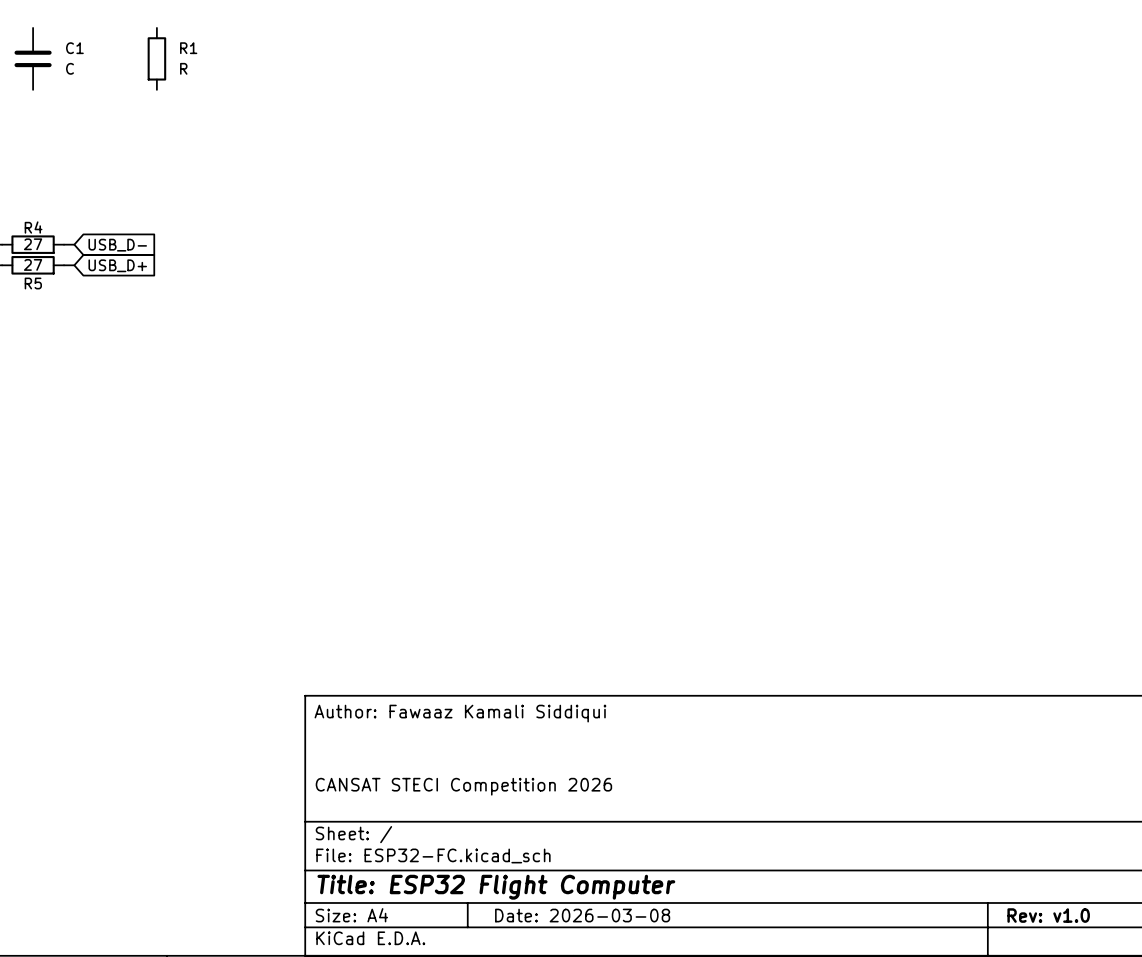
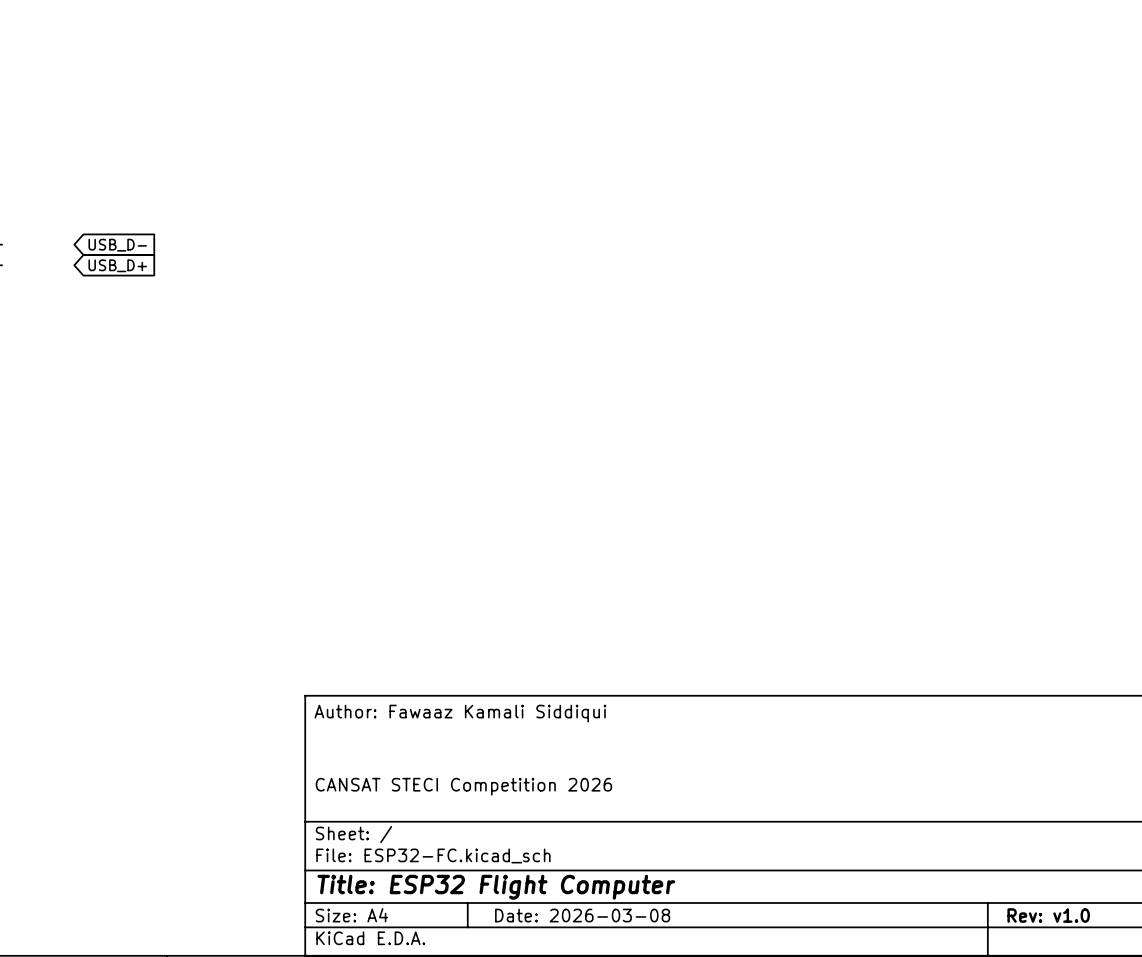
C1: C (33, 58) -> none
R1: R (156, 58) -> none
R4: 27 (33, 244) -> none
wire: (64, 244) (74, 244) -> none
R5: 27 (33, 265) -> none
wire: (64, 265) (74, 265) -> none

